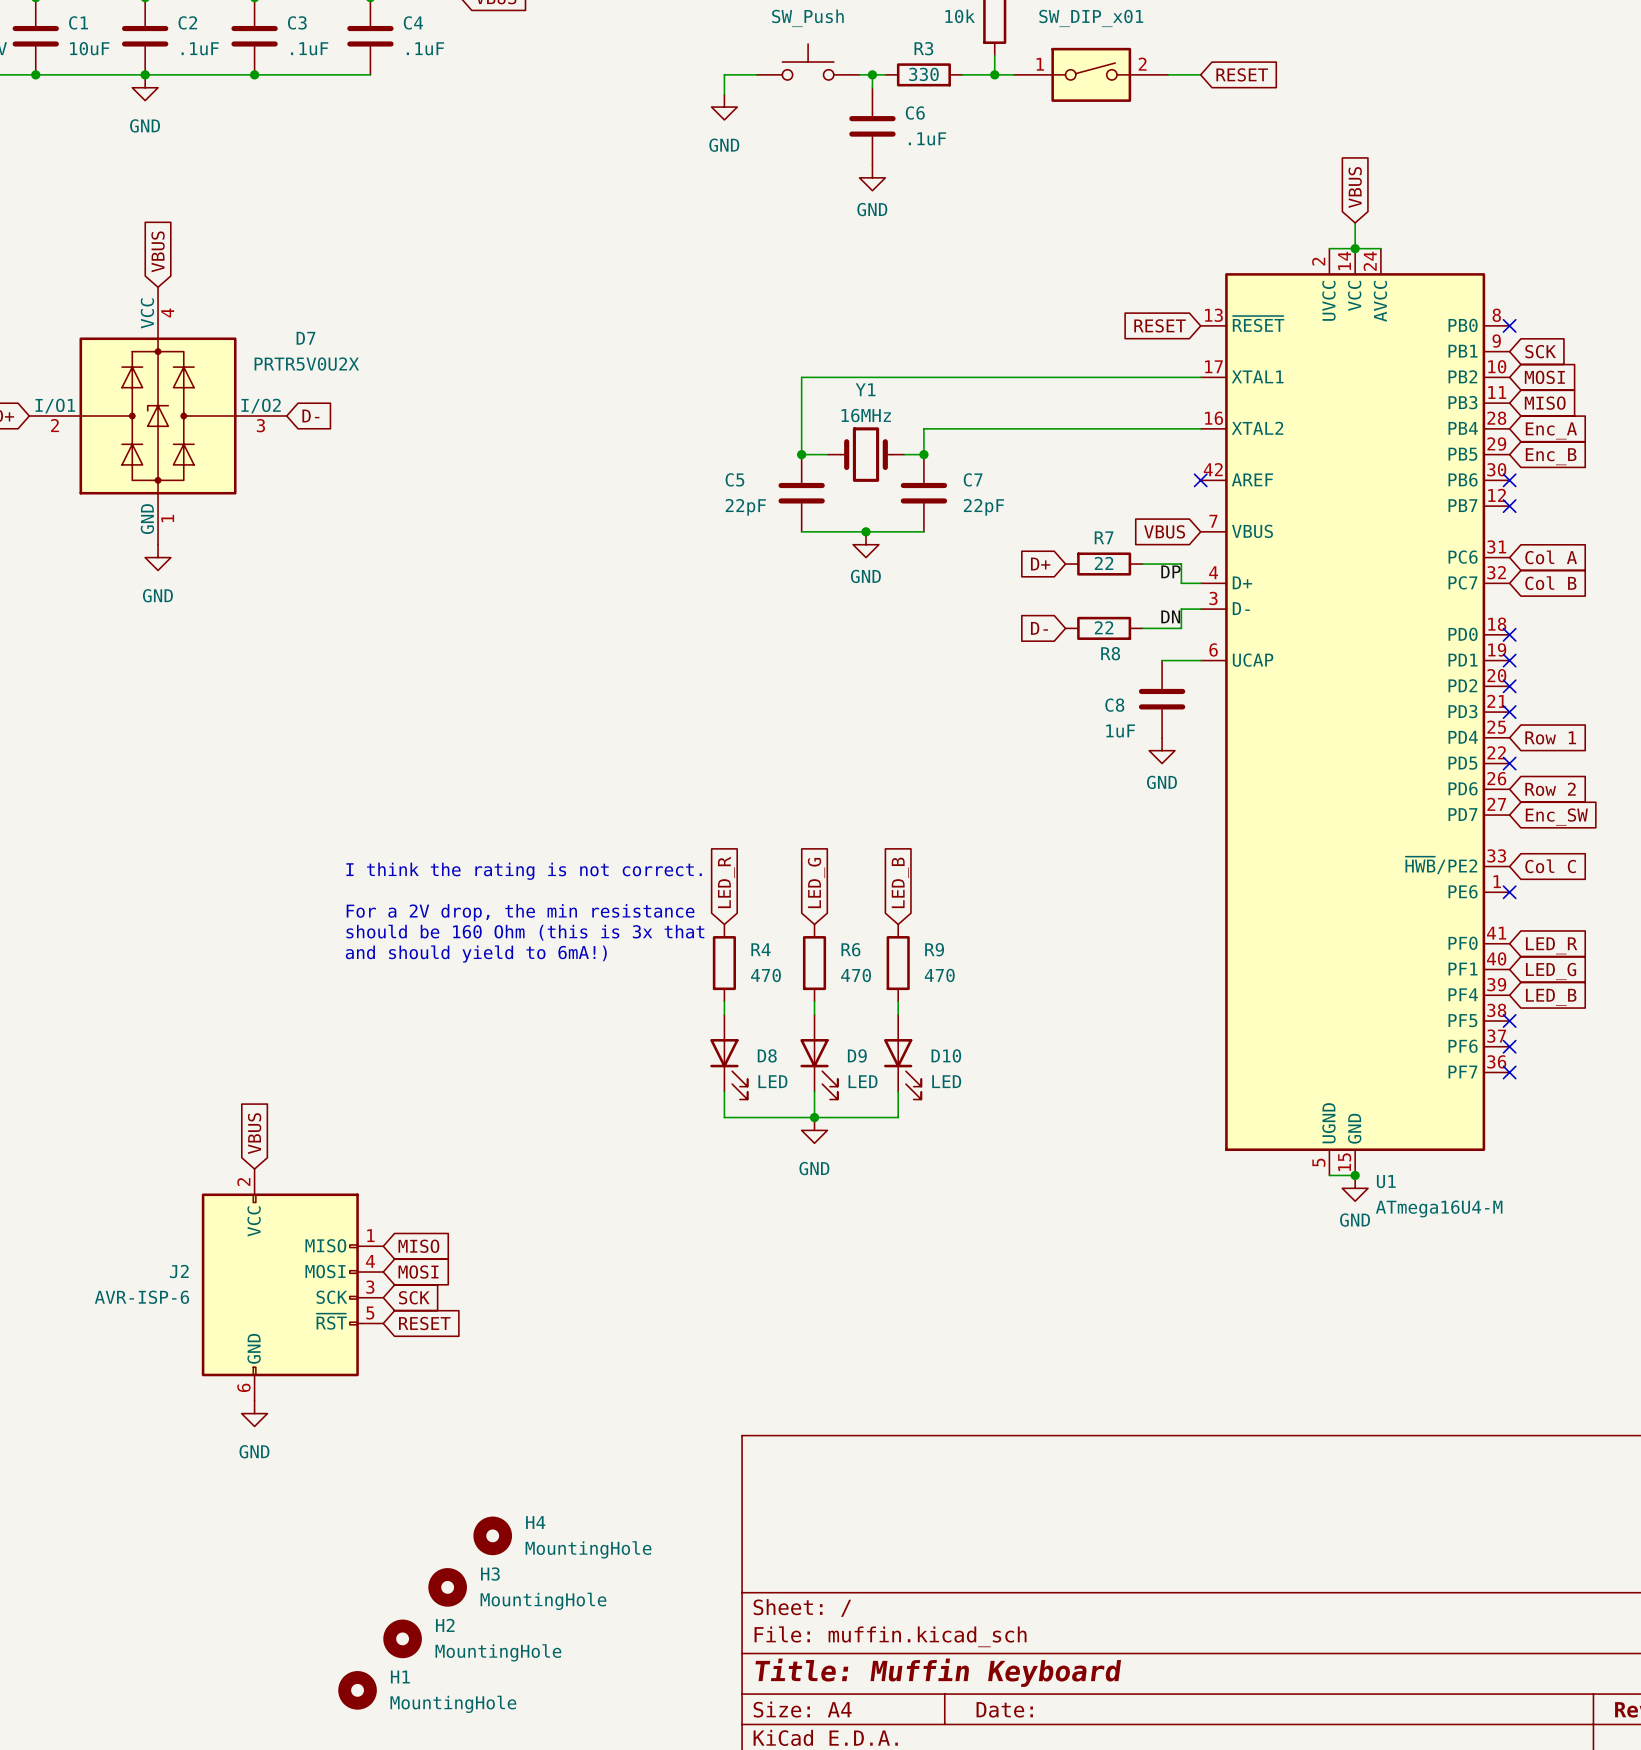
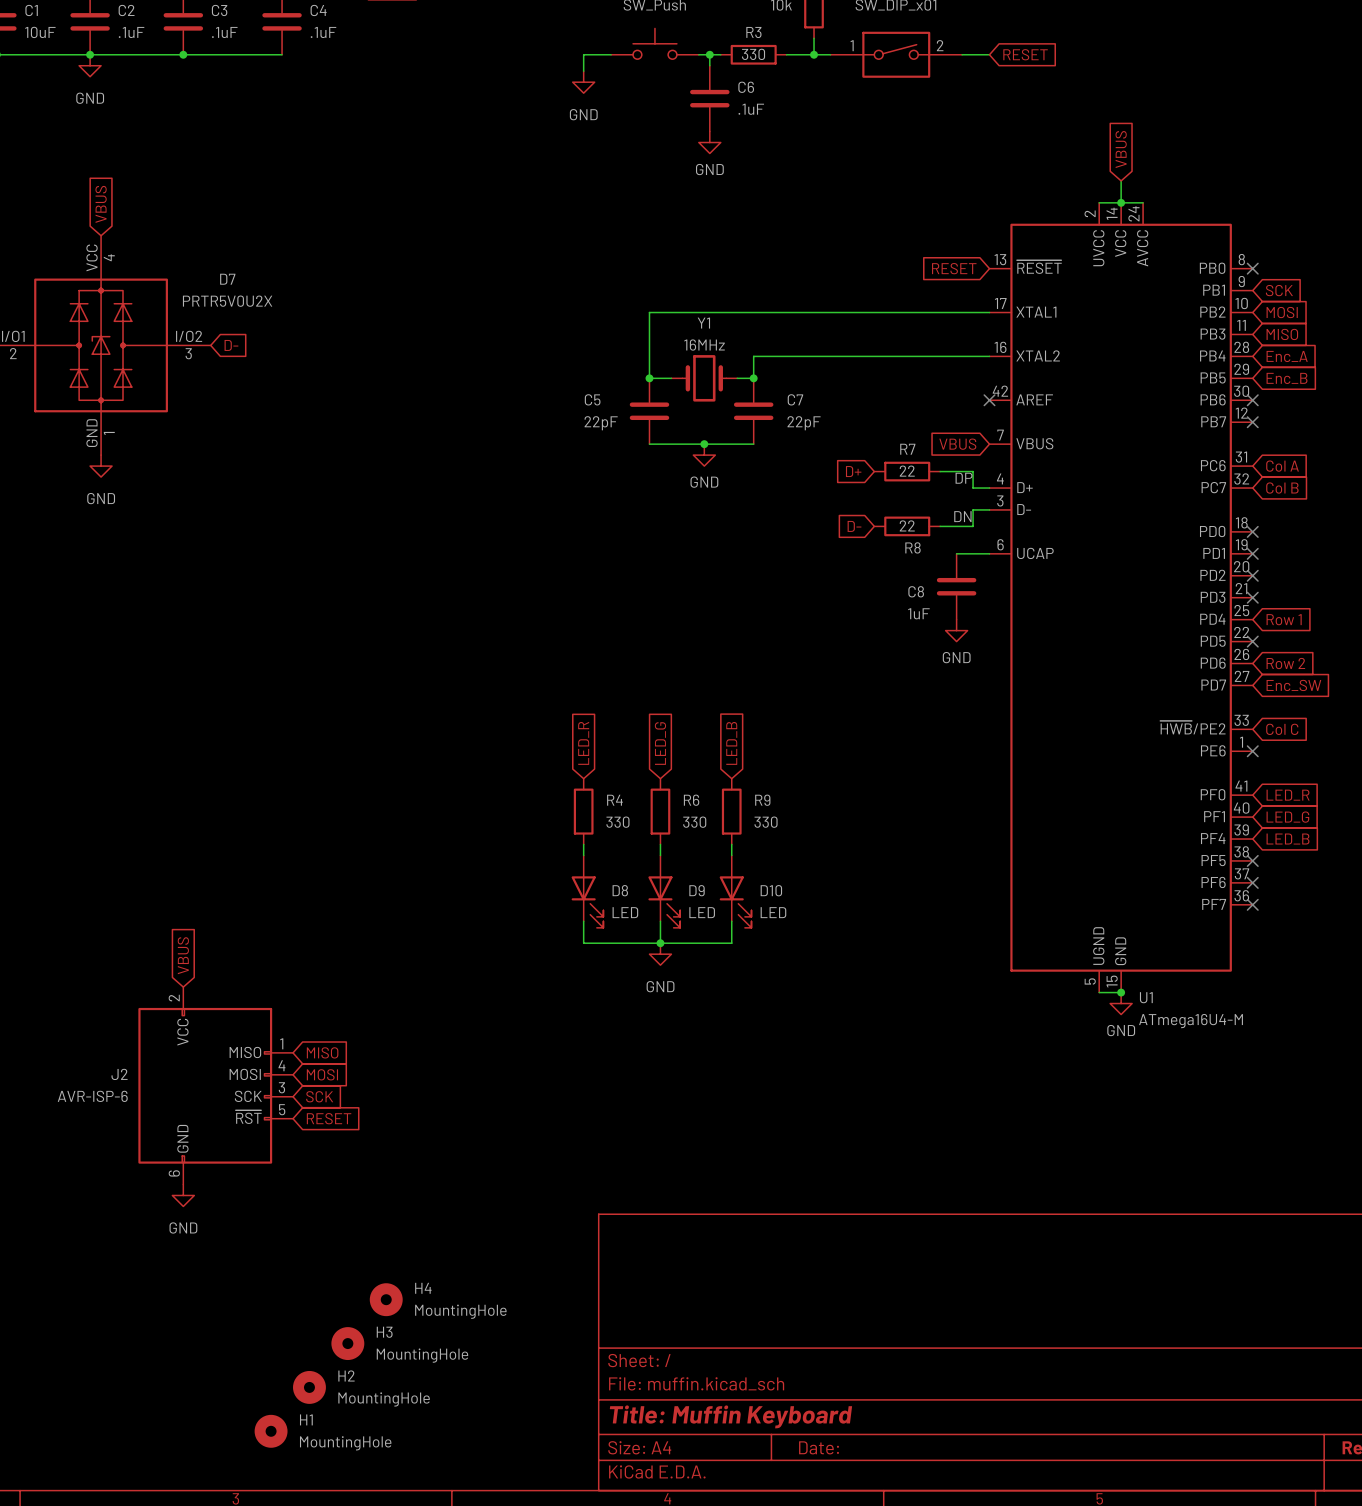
text: I think the rating is not correct. (524, 871) -> none
text: For a 2V drop, the min resistance (520, 912) -> none
text: should be 160 Ohm (this is 3x that (525, 932) -> none
text: and should yield to 6mA!) (476, 954) -> none
R4 value: 470 (765, 975) -> 330 (617, 822)
R6 value: 470 (856, 975) -> 330 (694, 822)
R9 value: 470 (939, 975) -> 330 (766, 822)

